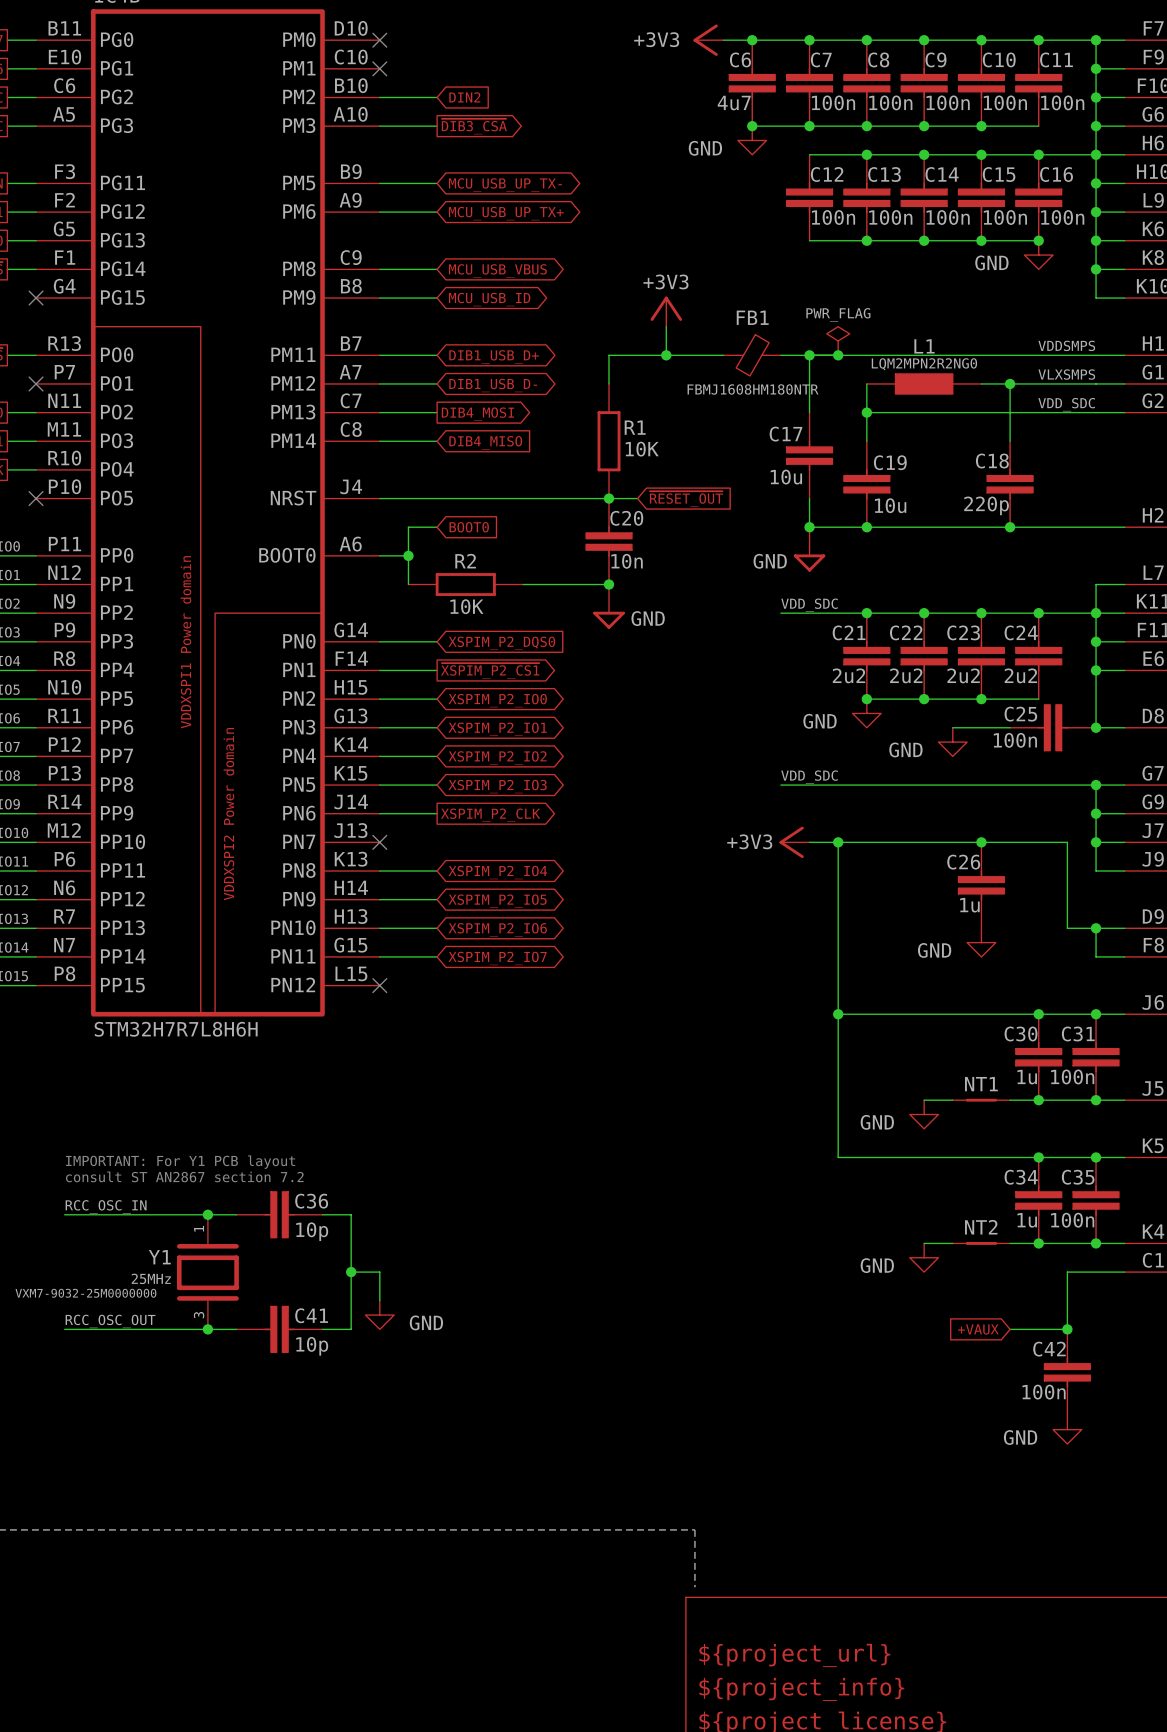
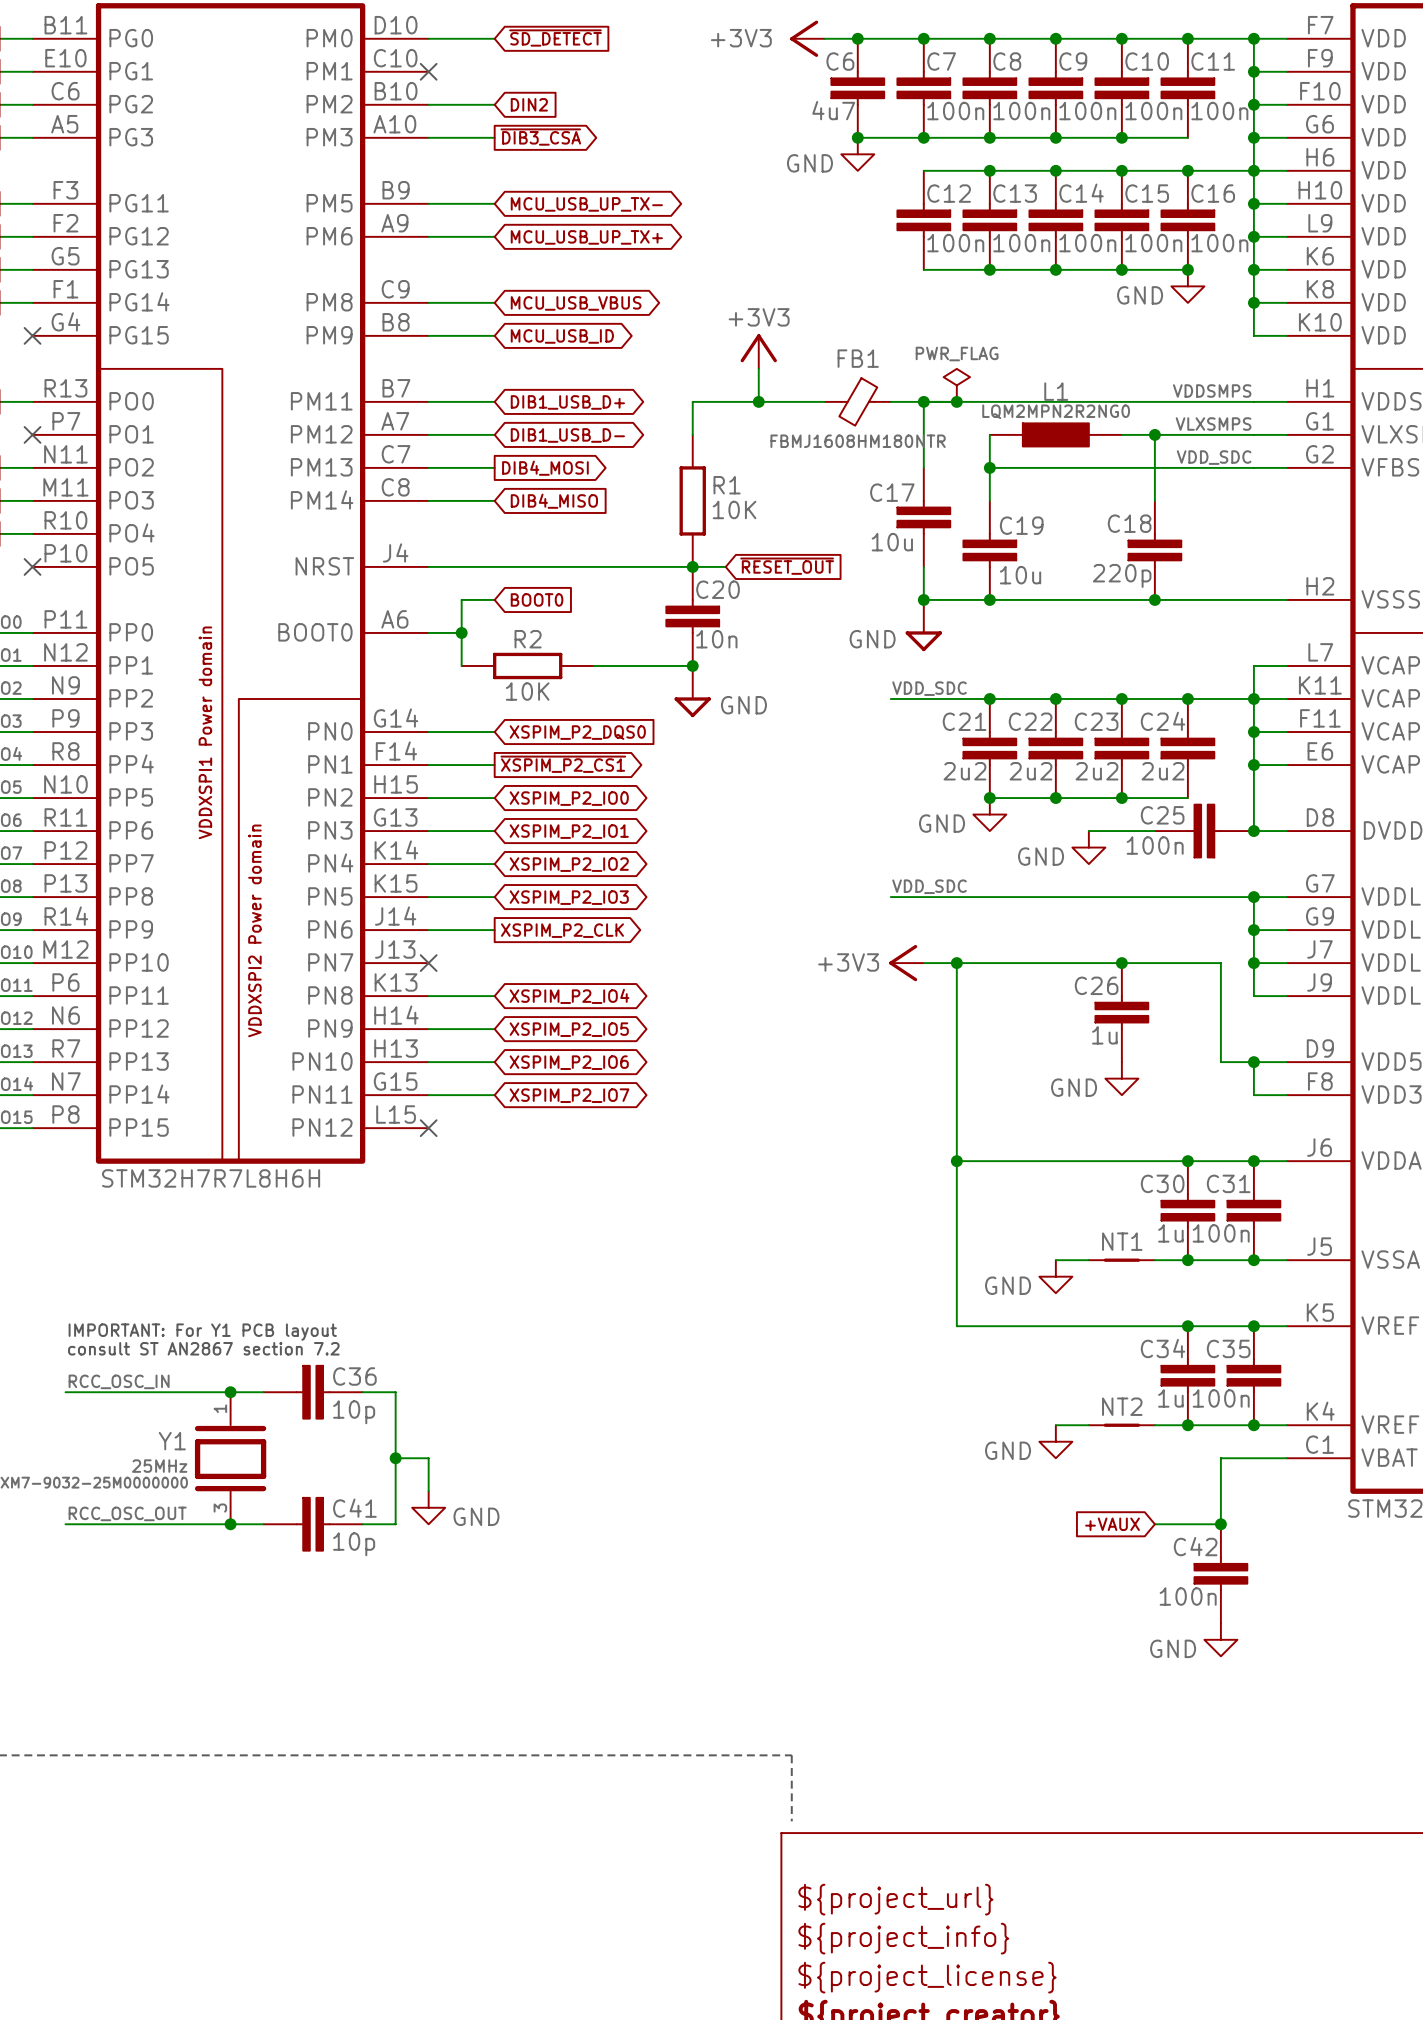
wire: none -> (428, 38) (494, 38)
no-connect mark: (379, 40) -> none
global label: none -> ~{SD_DETECT} (555, 38)

